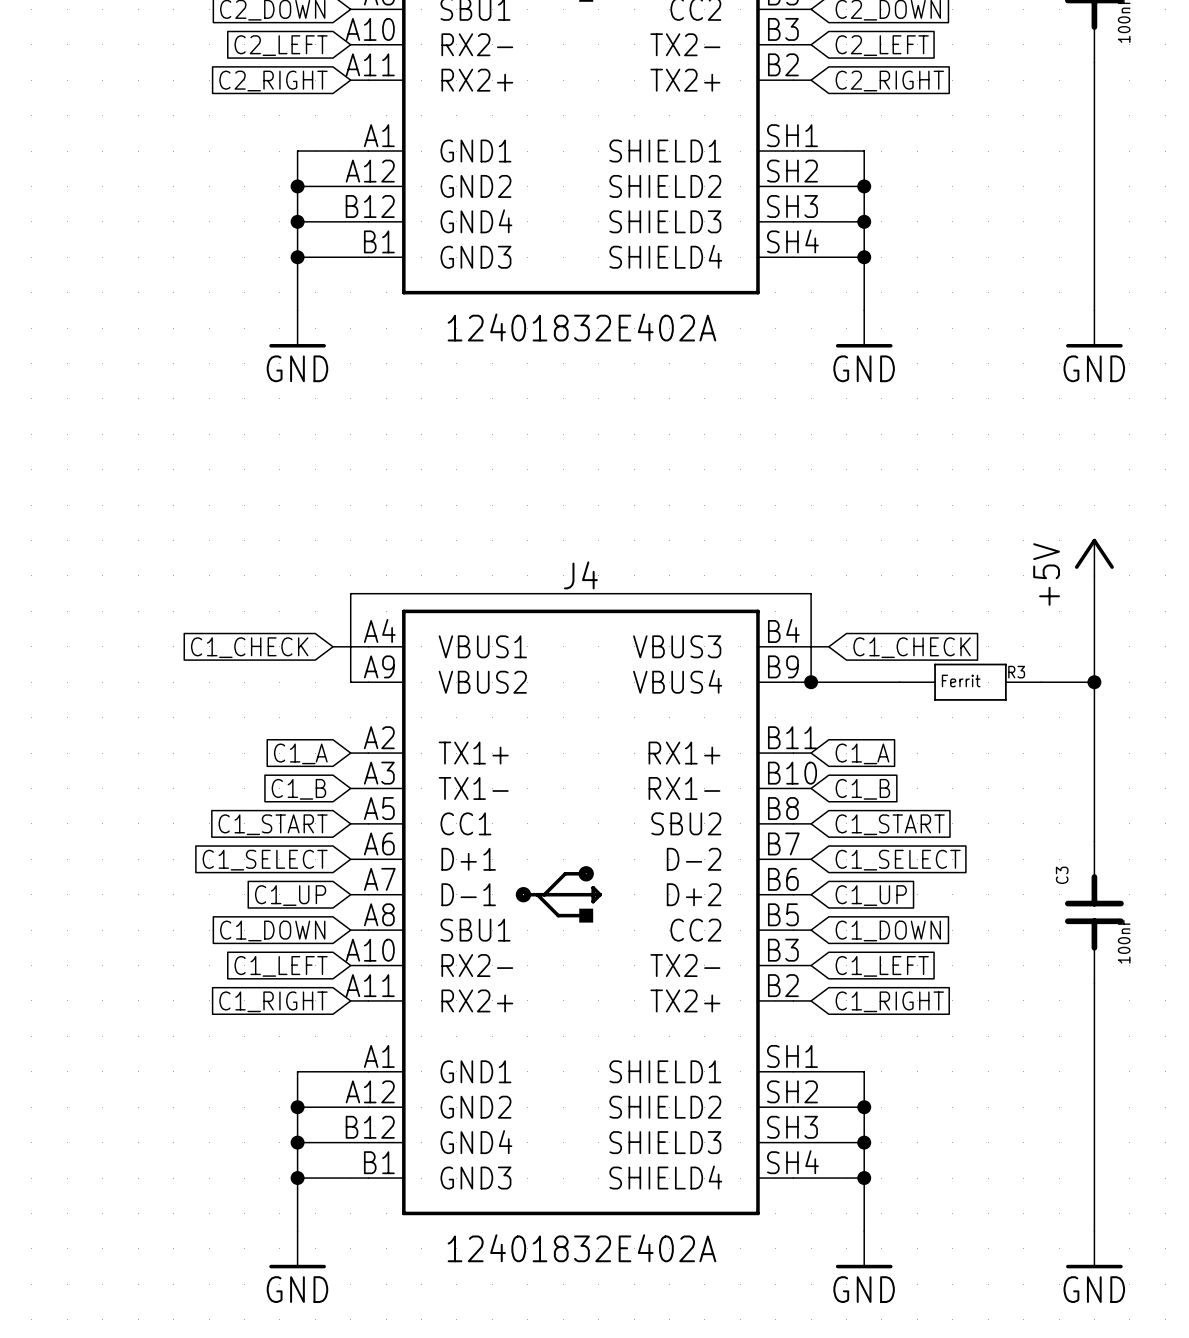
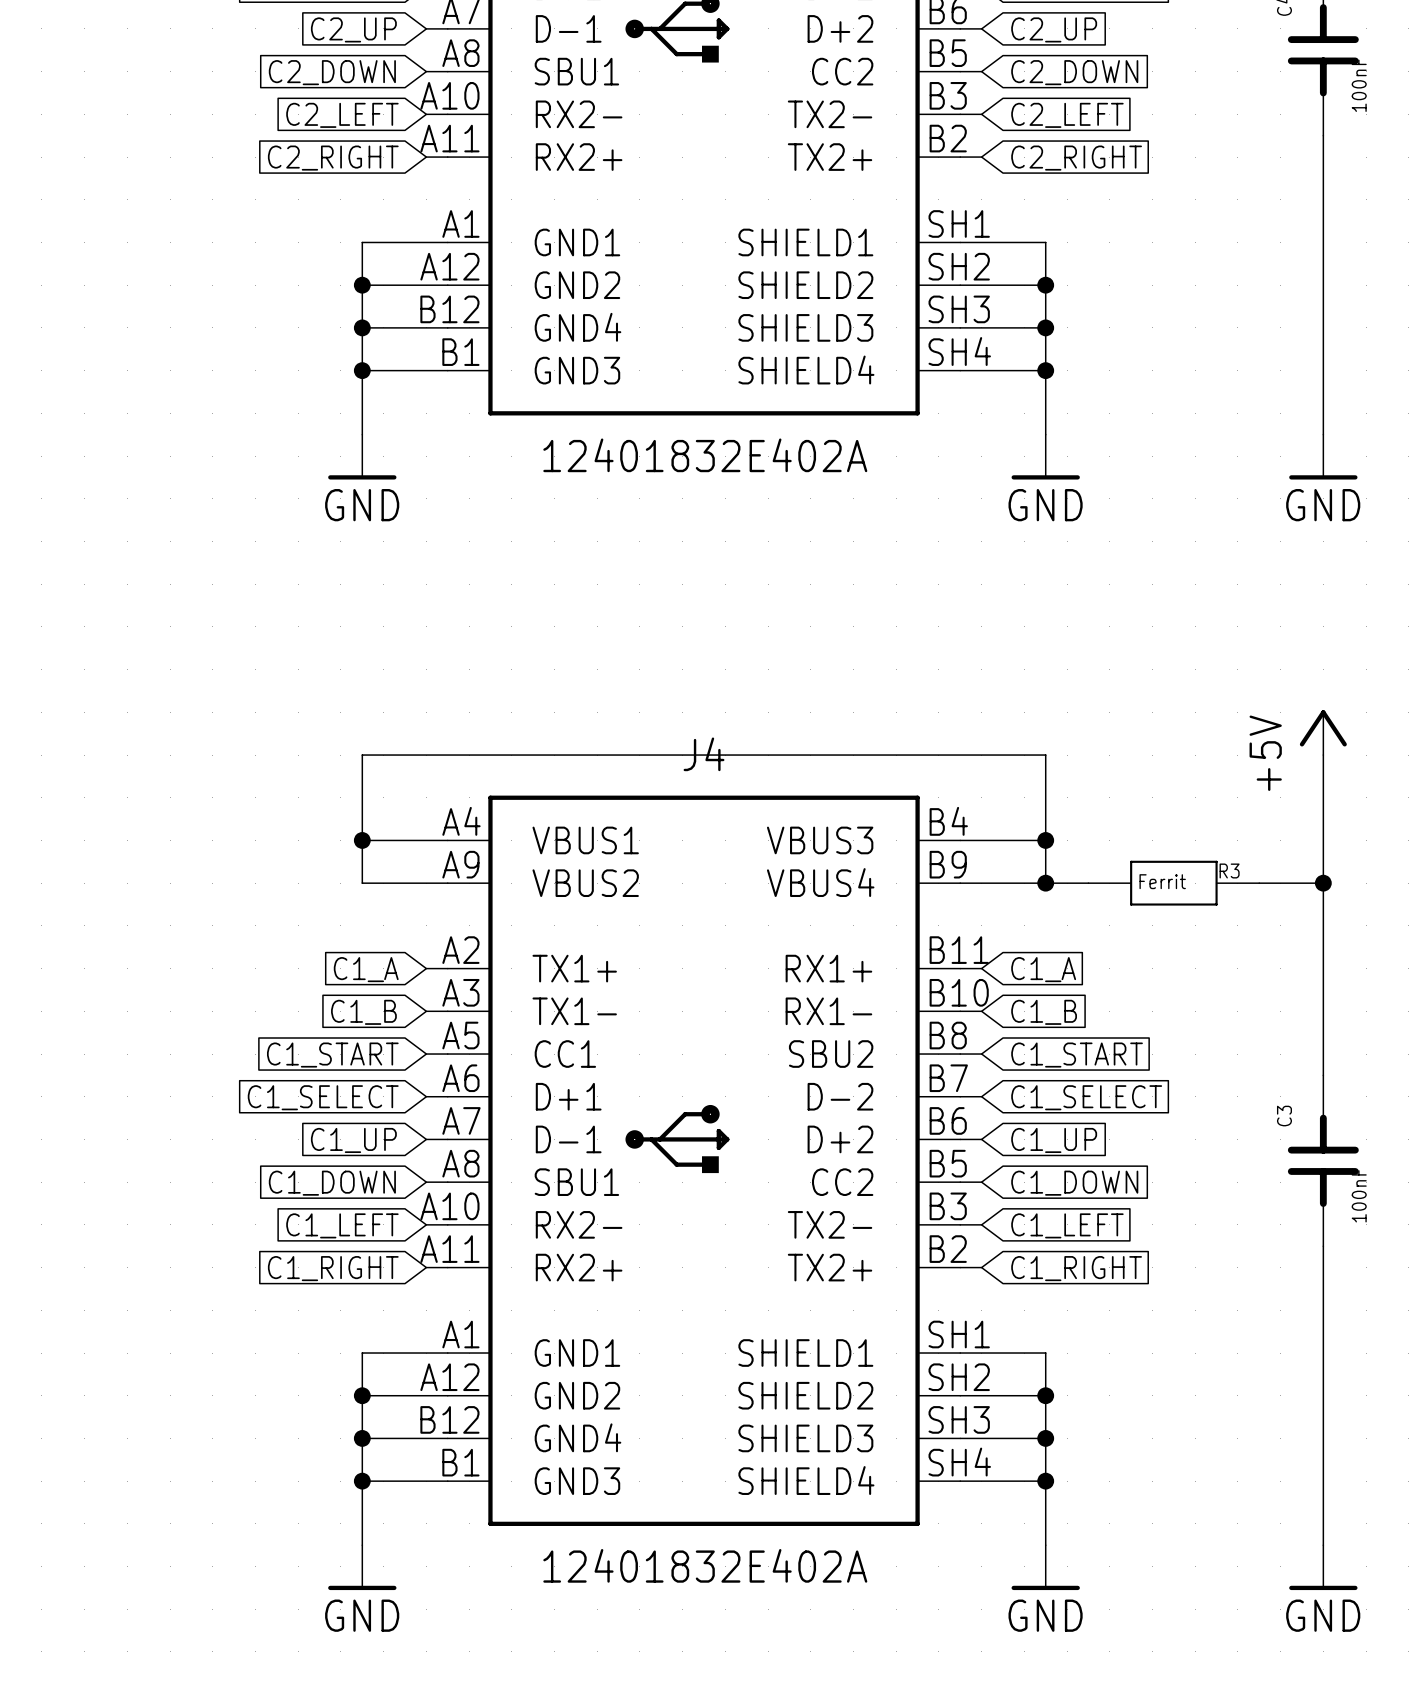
wire: none -> (362, 840) (405, 840)
junction: none -> (362, 840)
wire: none -> (1003, 840) (1045, 840)
junction: none -> (1045, 840)
global label: C1_CHECK (249, 647) -> none
global label: C1_CHECK (912, 647) -> none
wire: (350, 682) (350, 593) (811, 593) (811, 682) -> (426, 883) (362, 883) (362, 755) (1045, 755) (1045, 883)
junction: (811, 682) -> none
junction: none -> (1045, 883)

